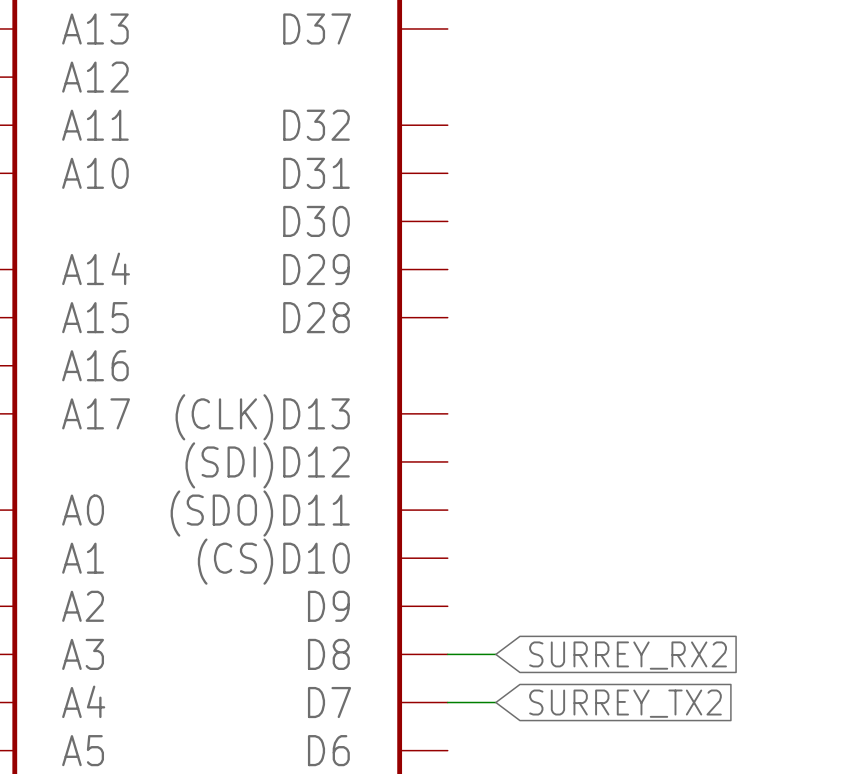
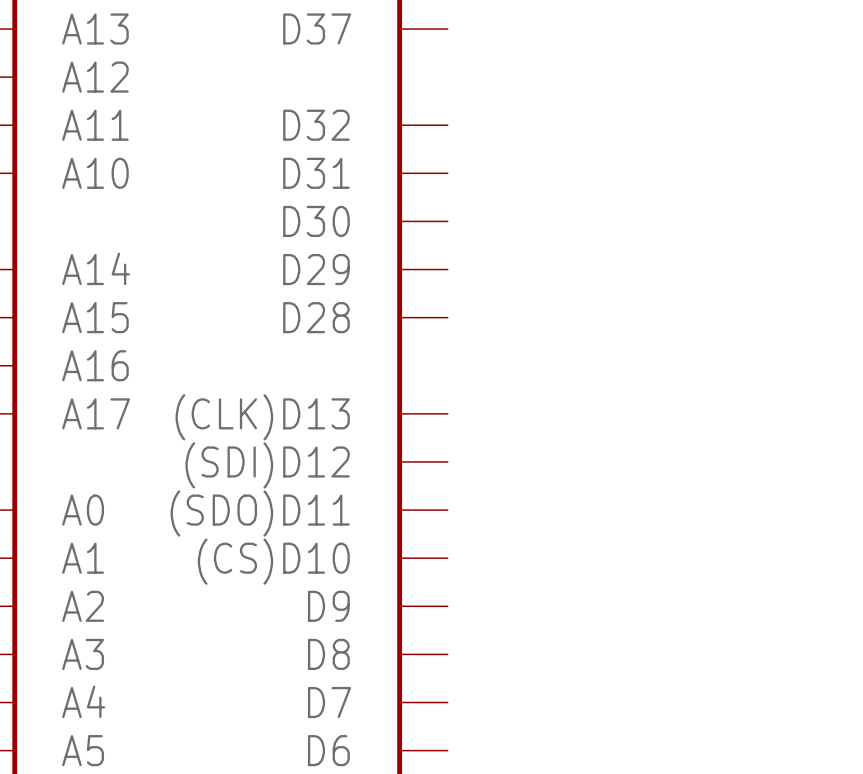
wire: (447, 654) (495, 654) -> none
global label: SURREY_RX2 (628, 655) -> none
wire: (447, 702) (495, 702) -> none
global label: SURREY_TX2 (625, 703) -> none

